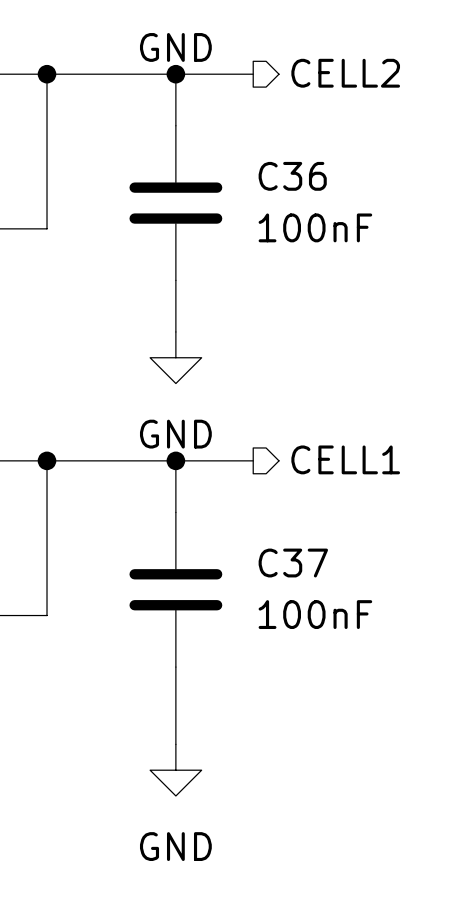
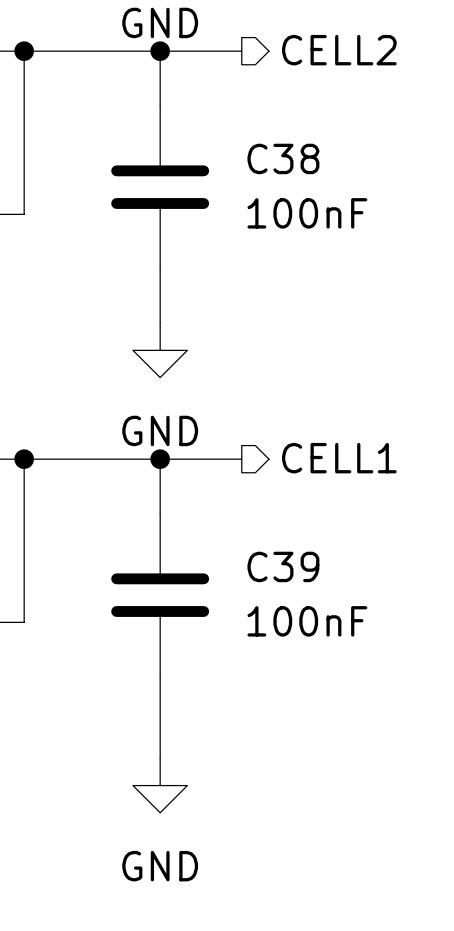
C36 name: C36 (292, 176) -> C38 (283, 158)
C37 name: C37 (293, 563) -> C39 (283, 566)

